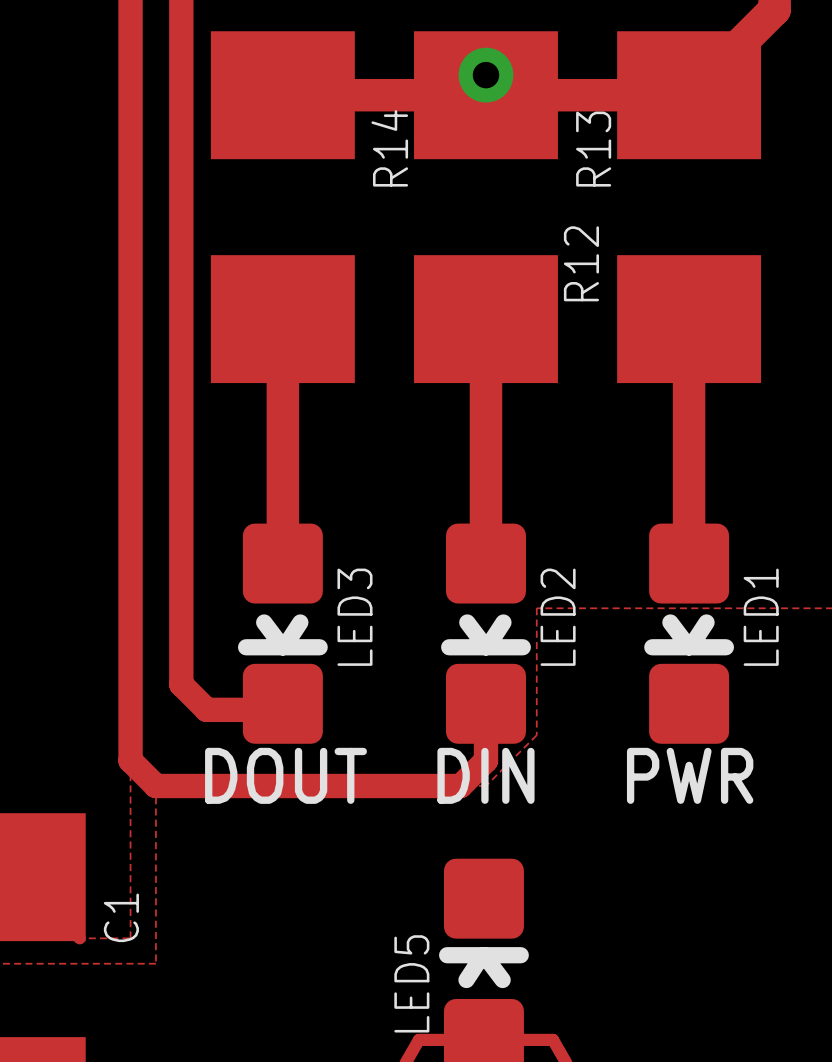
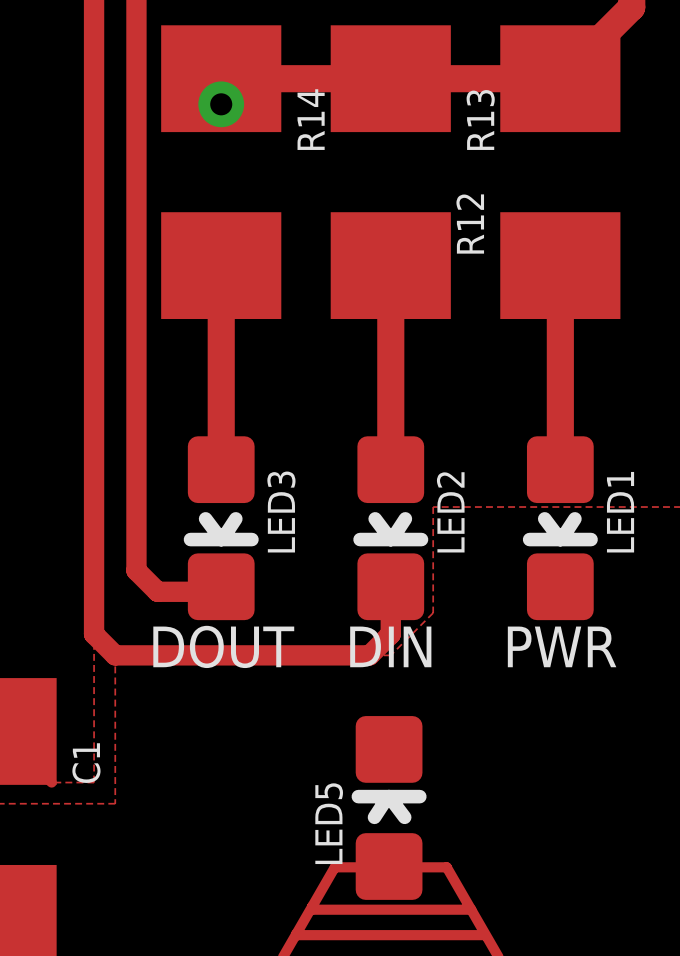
via position: (485, 75) -> (221, 104)

